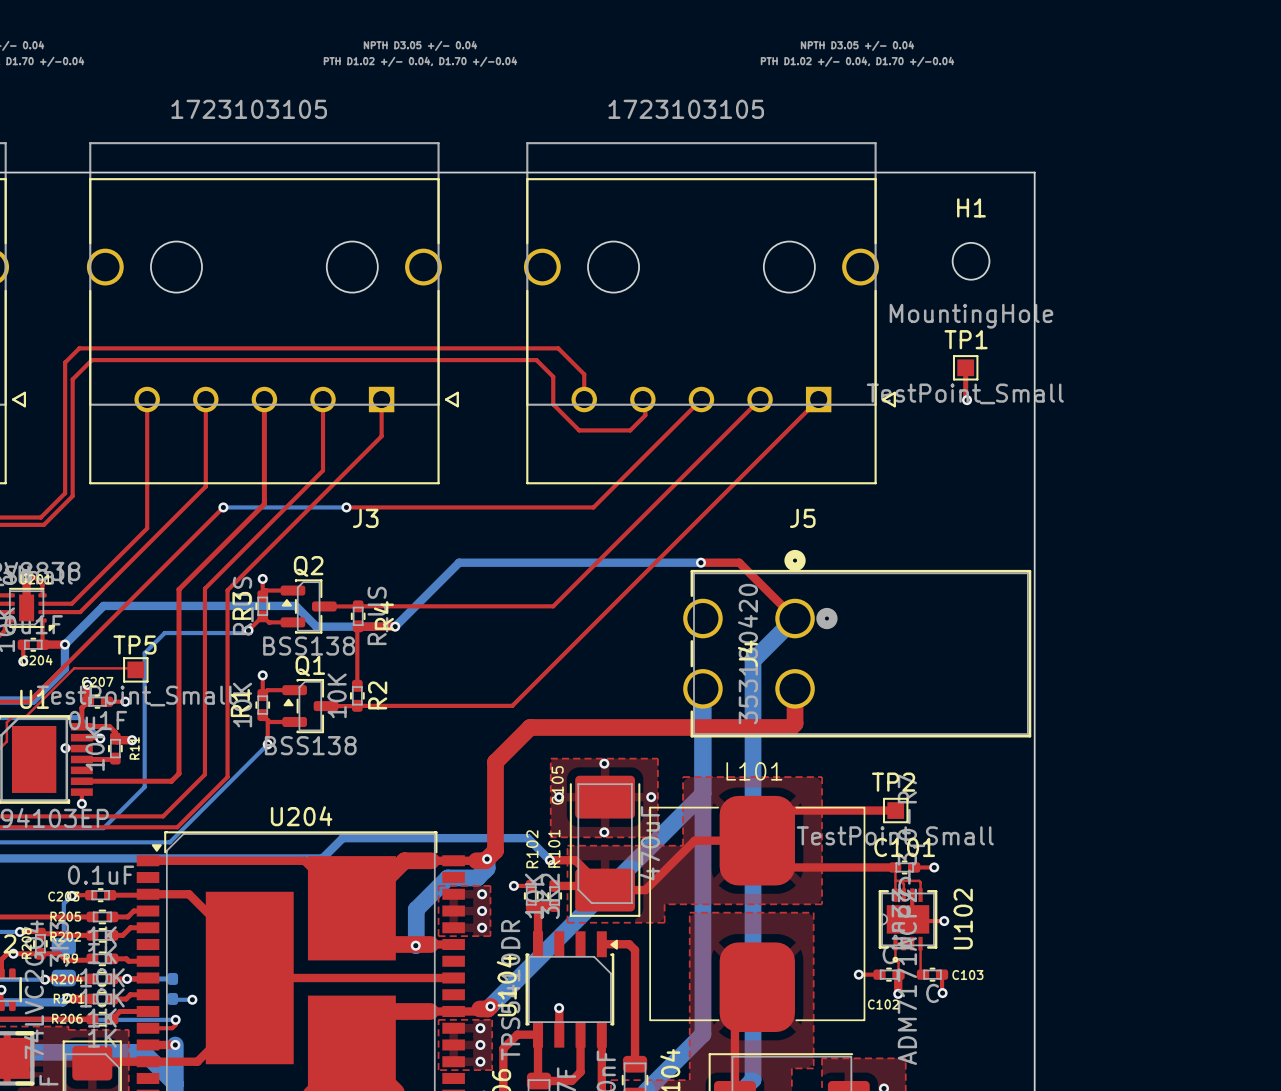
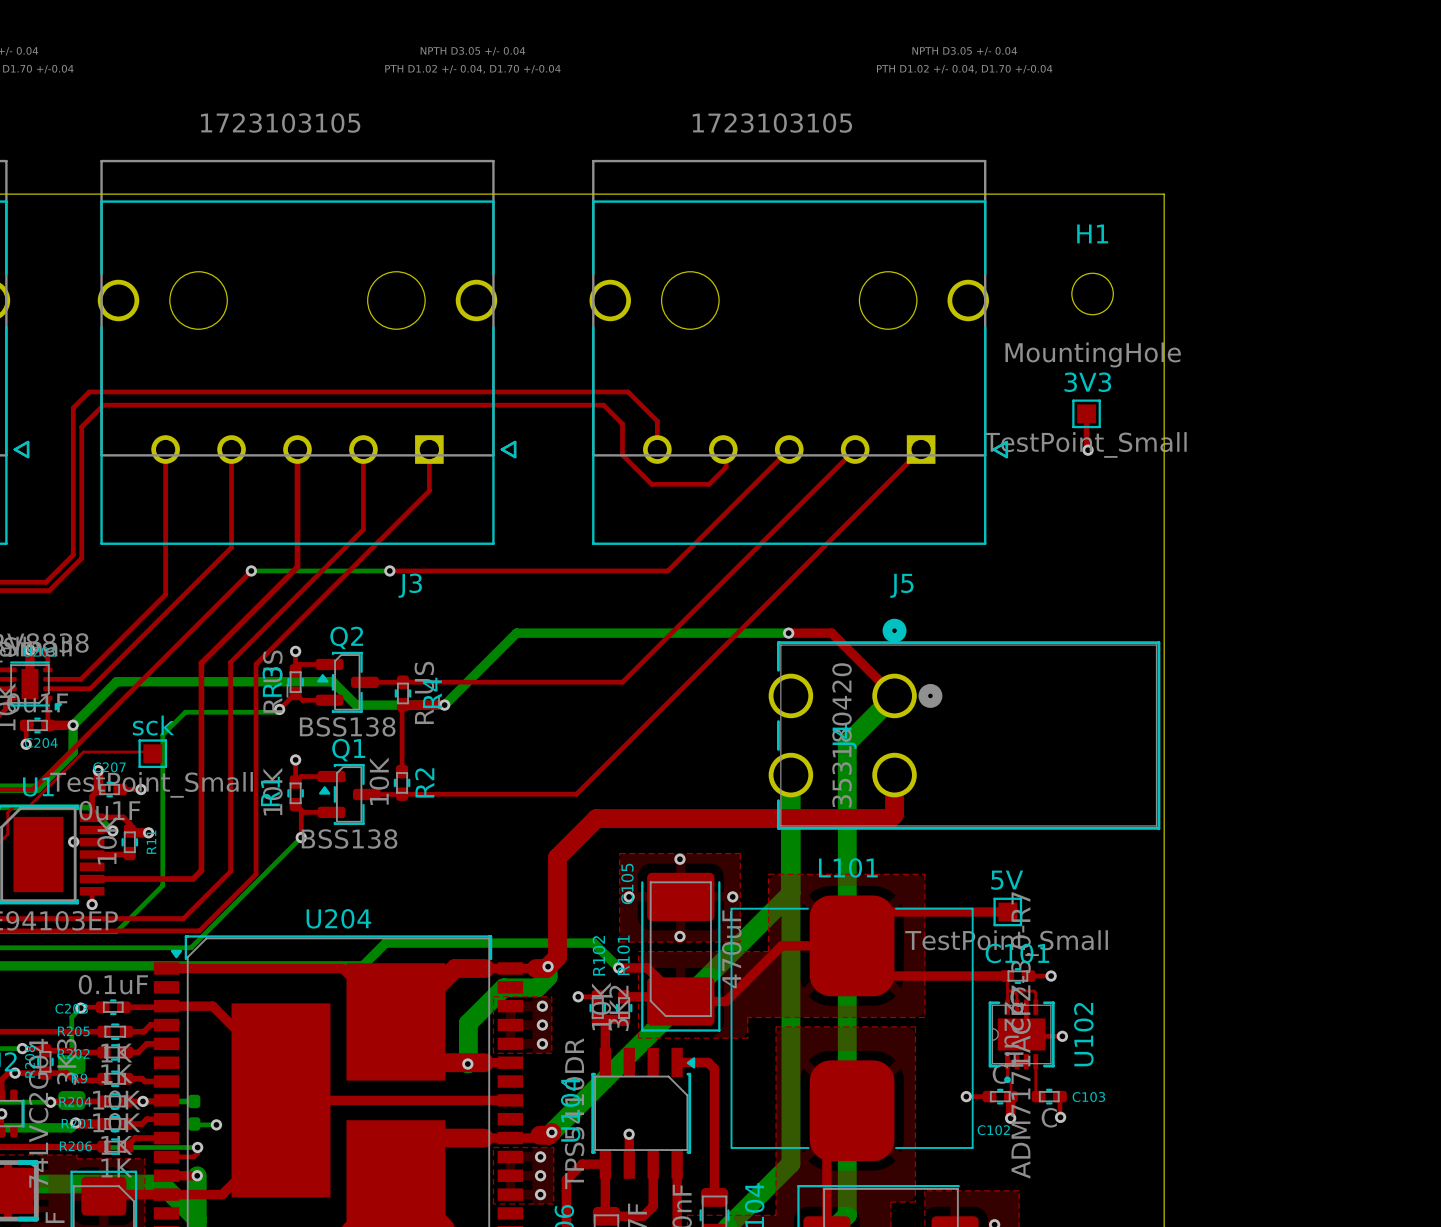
TP1 name: TP1 (966, 339) -> 3V3 (1087, 382)
TP5 name: TP5 (135, 645) -> sck (153, 725)
TP2 name: TP2 (893, 782) -> 5V (1007, 880)

